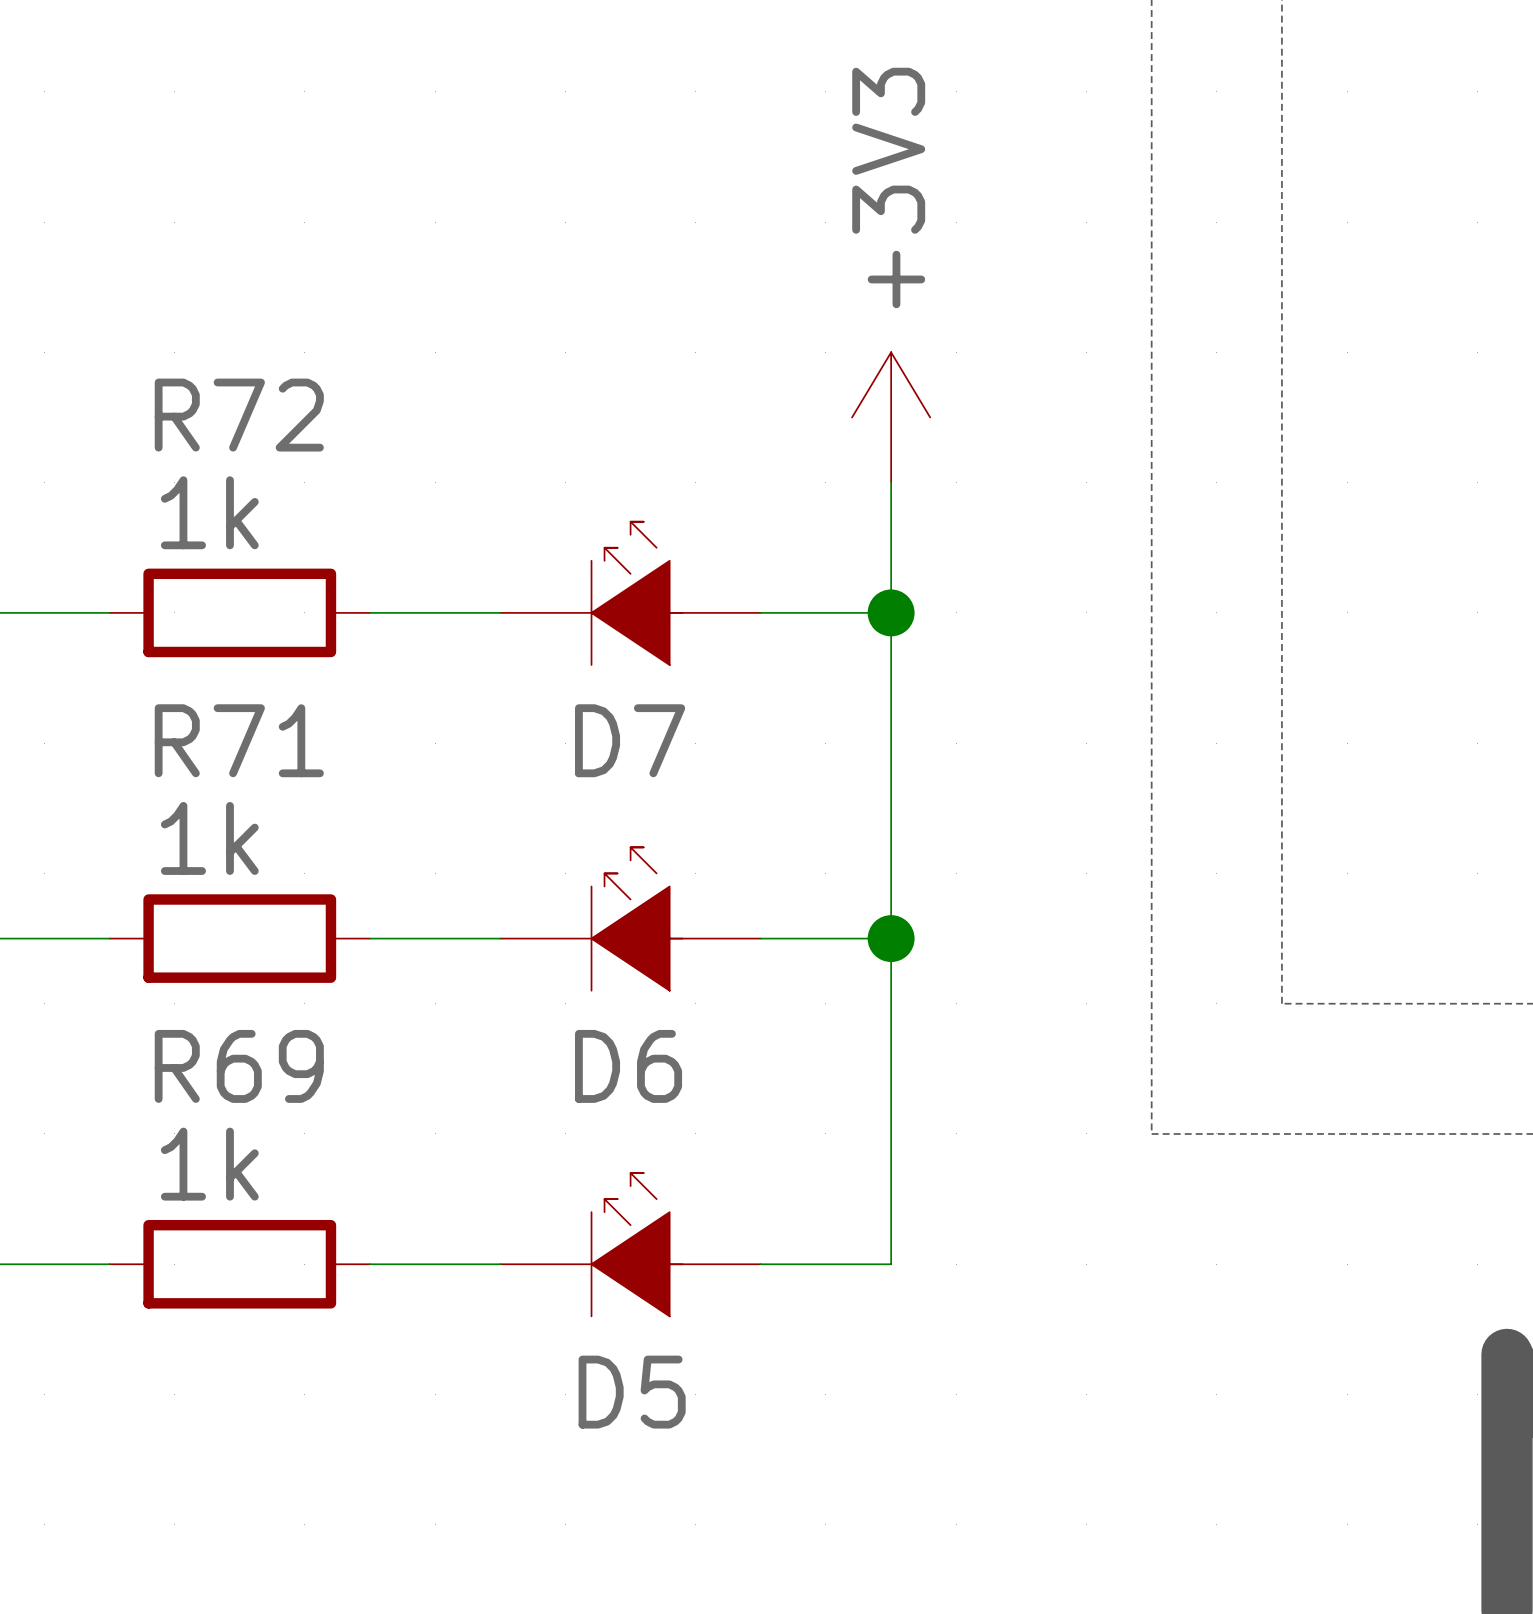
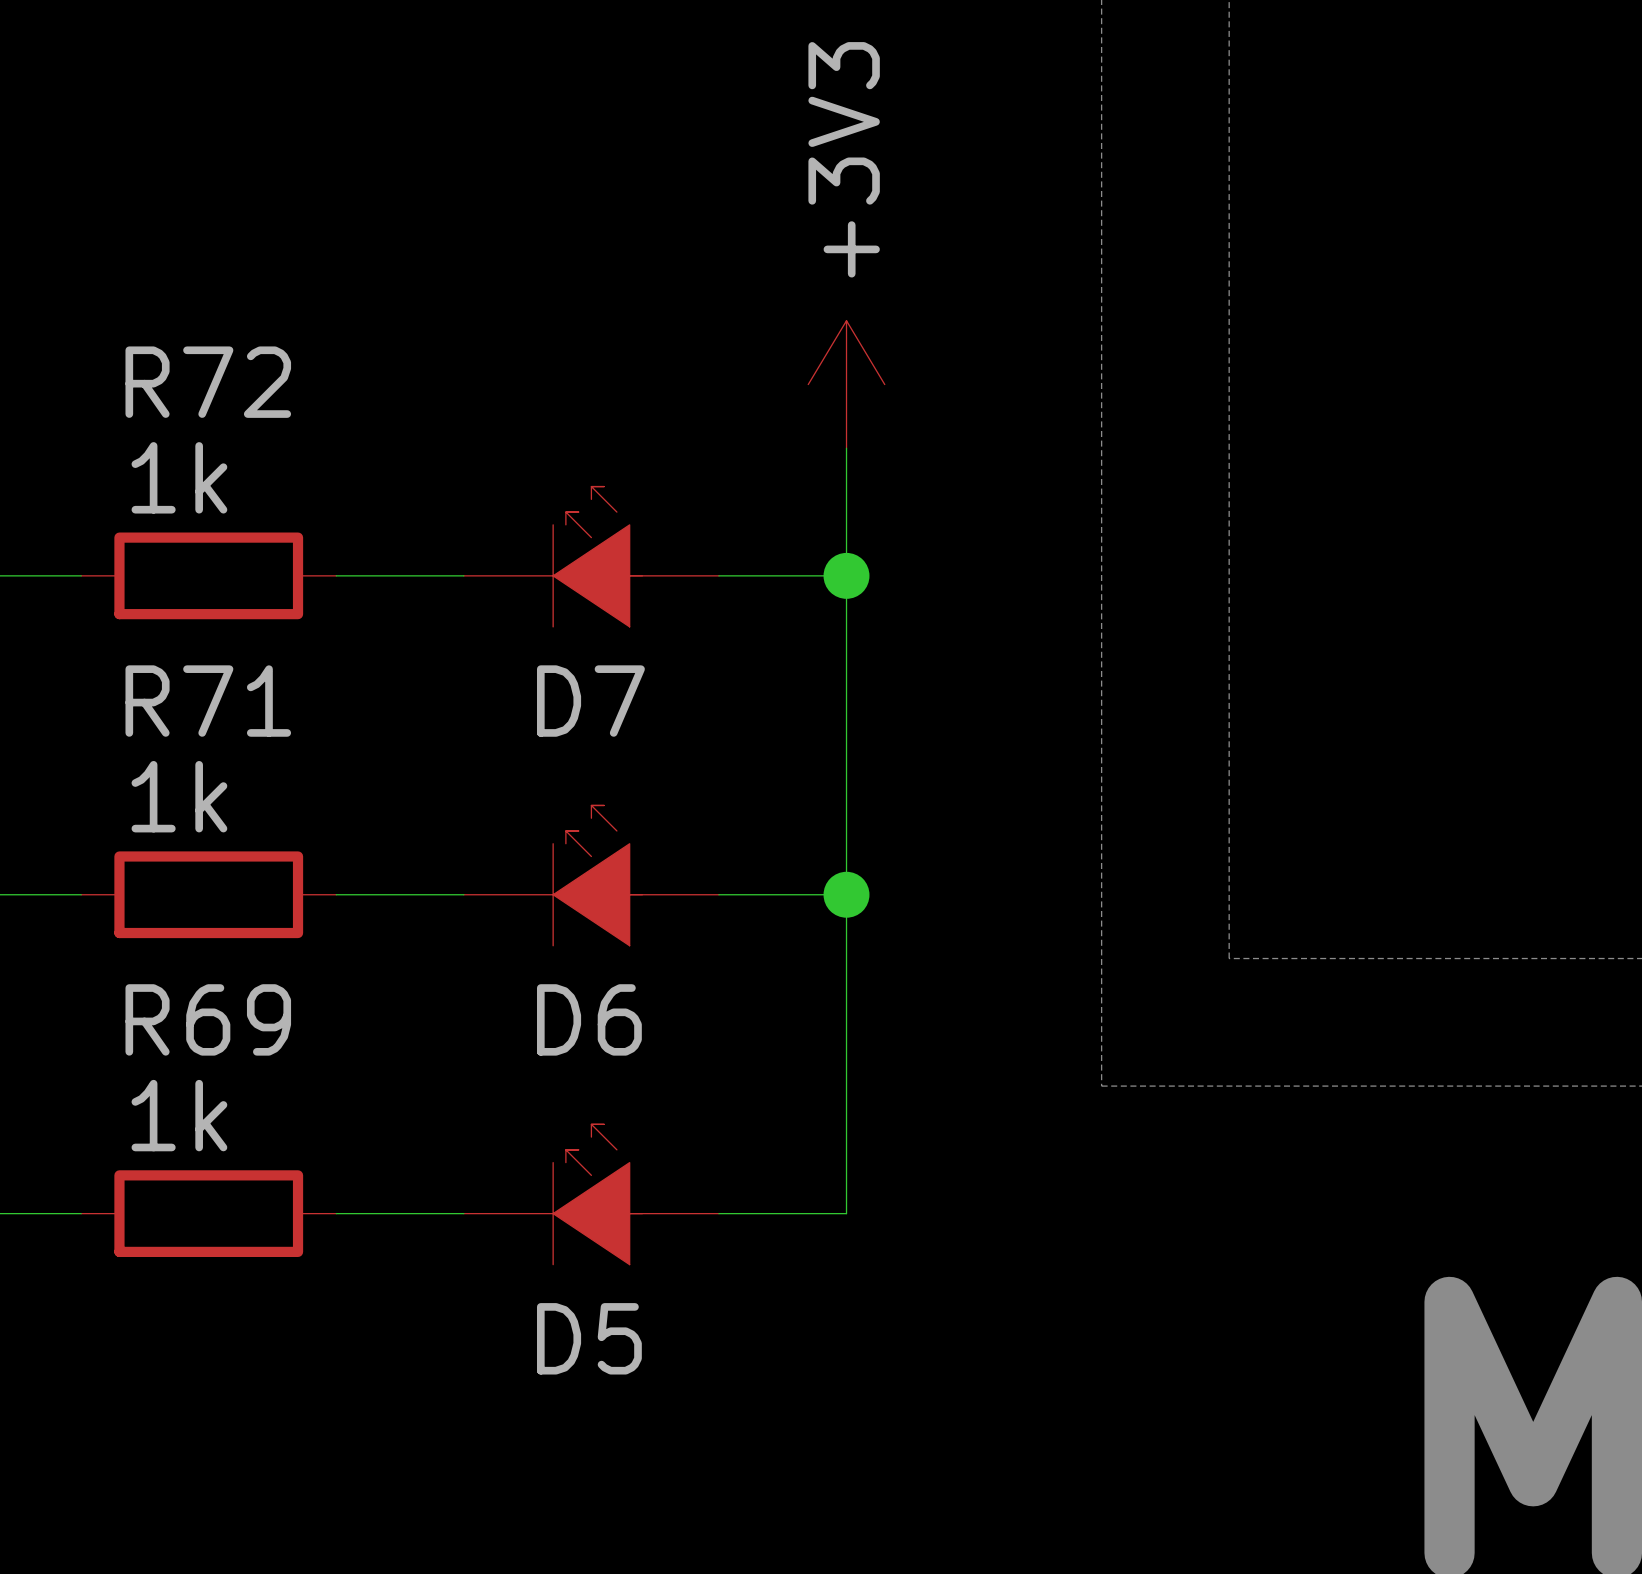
D5 name position: D5 (632, 1392) -> D5 (589, 1338)

